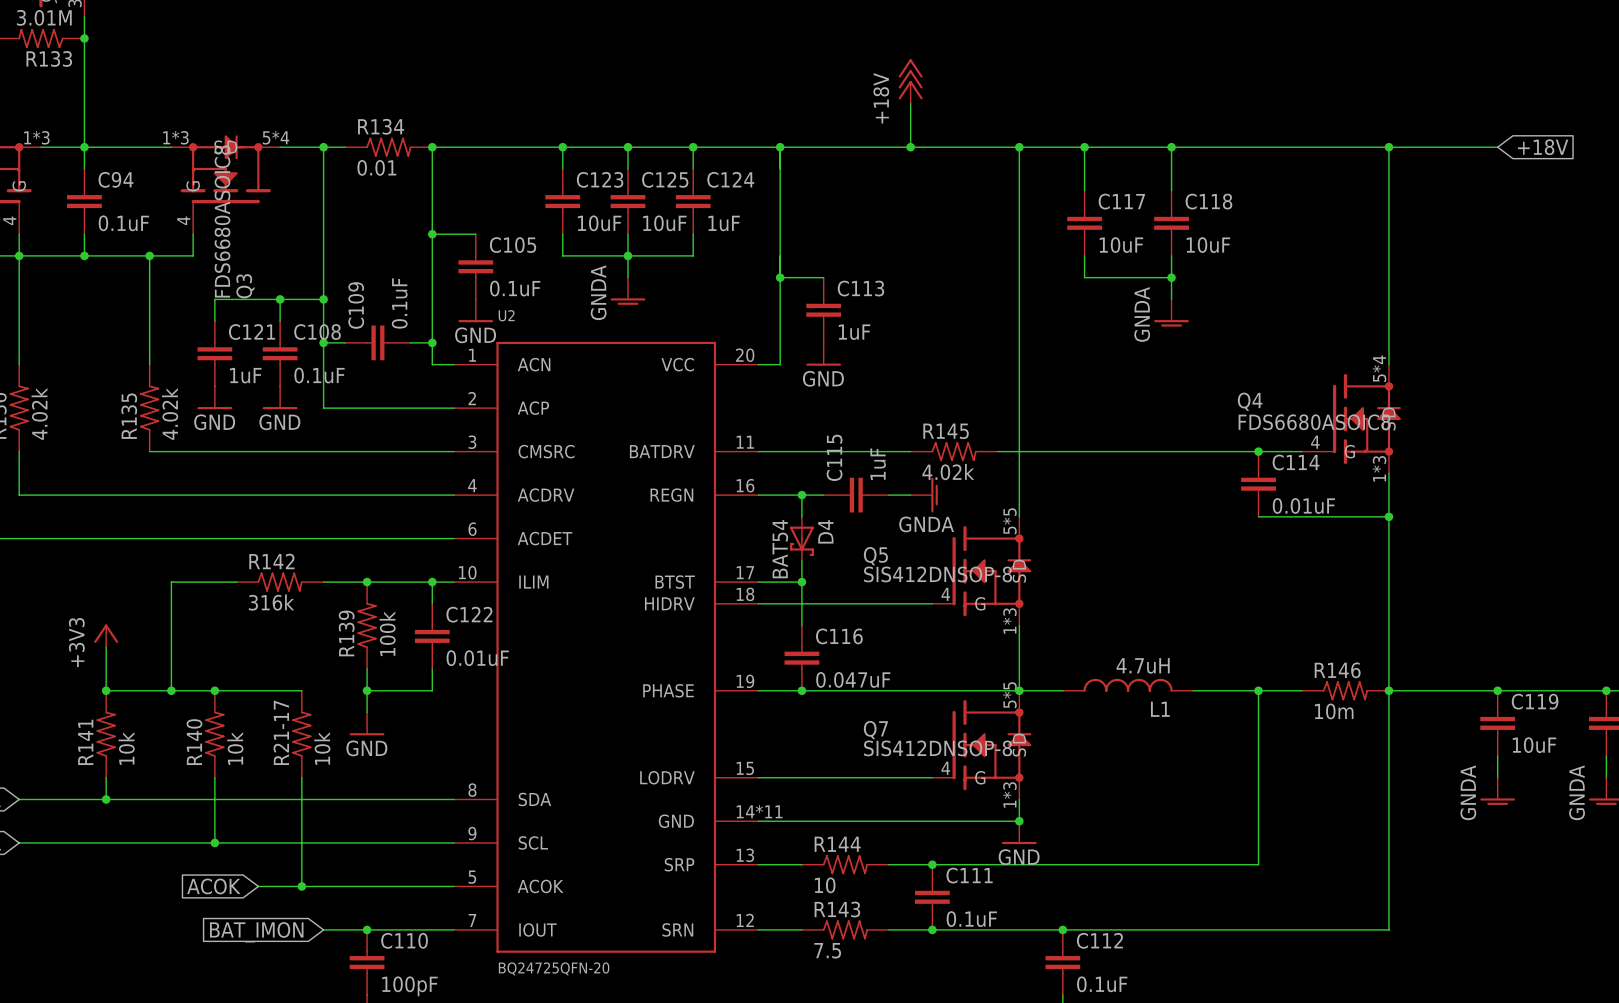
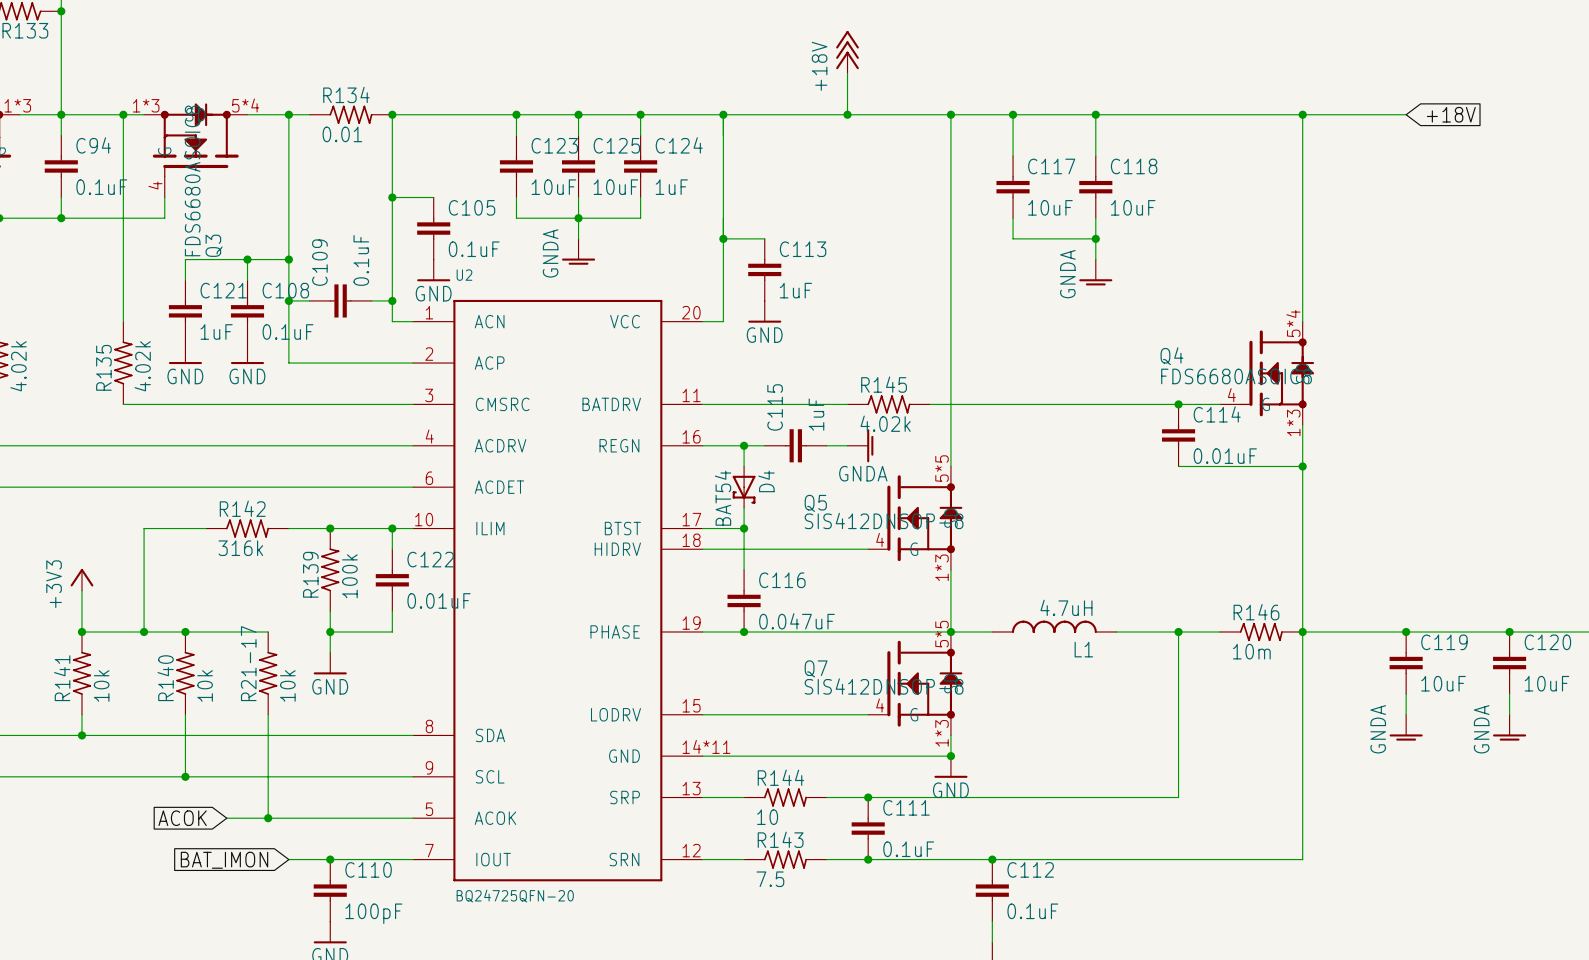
wire: none -> (123, 114) (123, 218)
junction: none -> (123, 114)
junction: (149, 255) -> none

